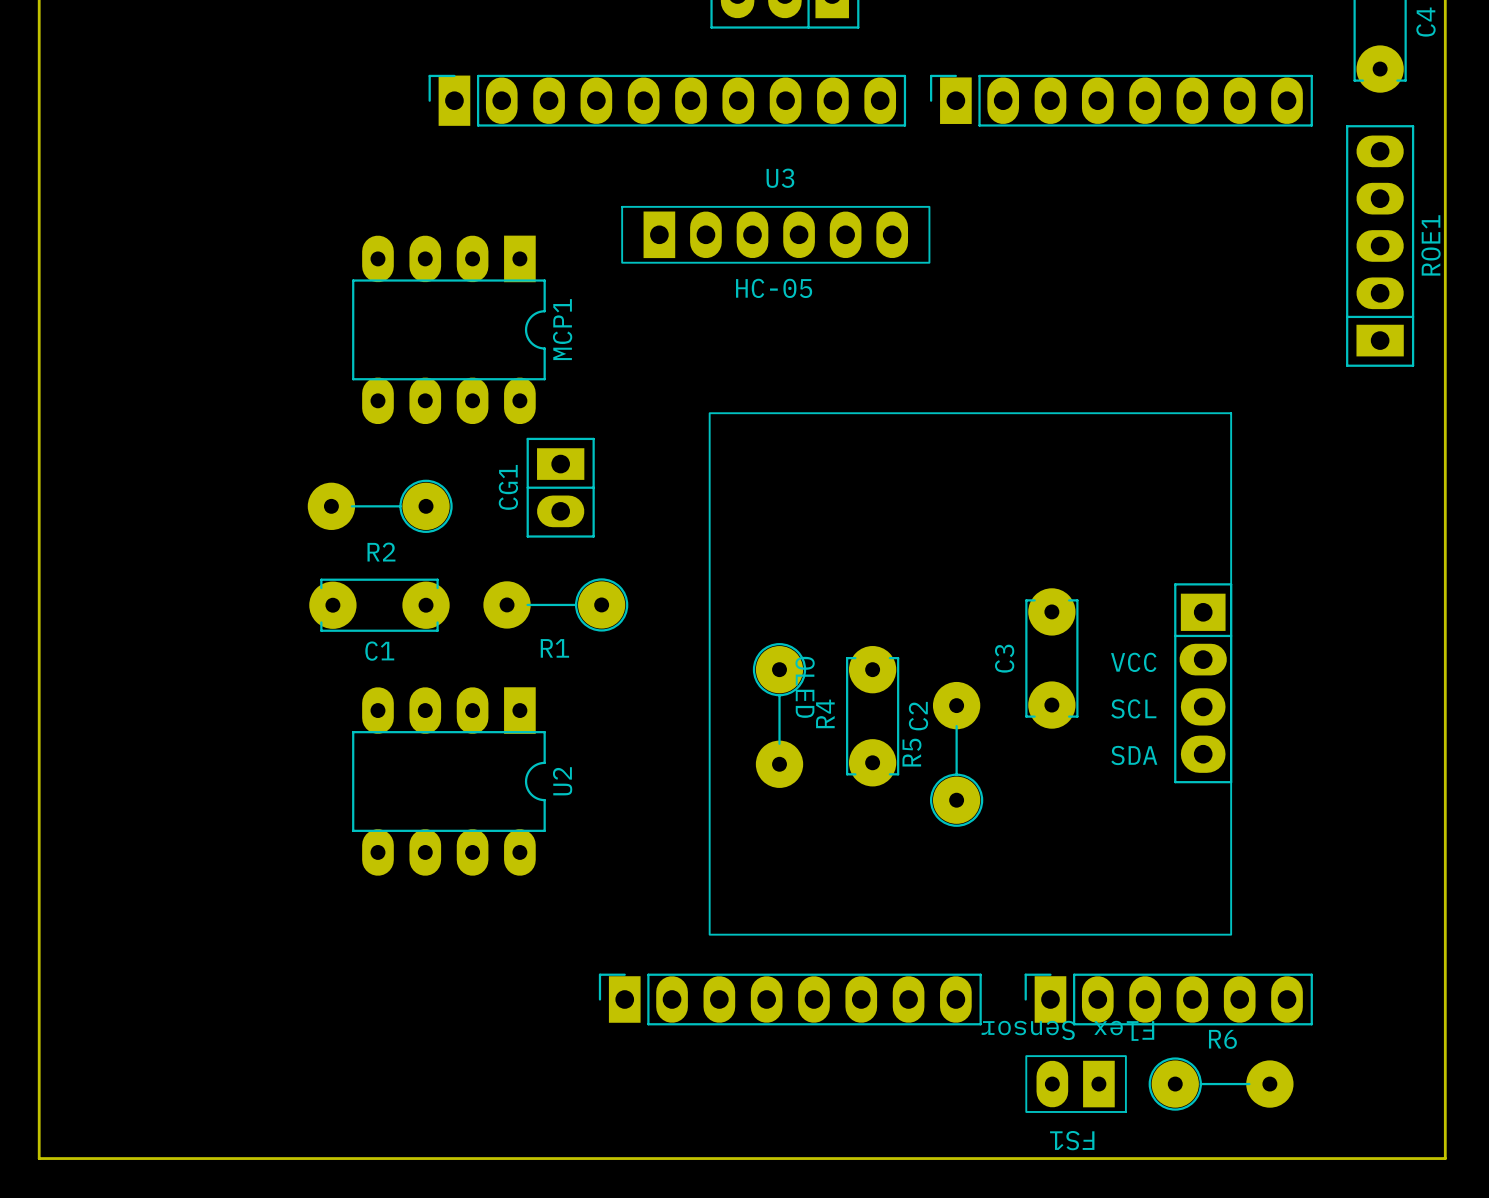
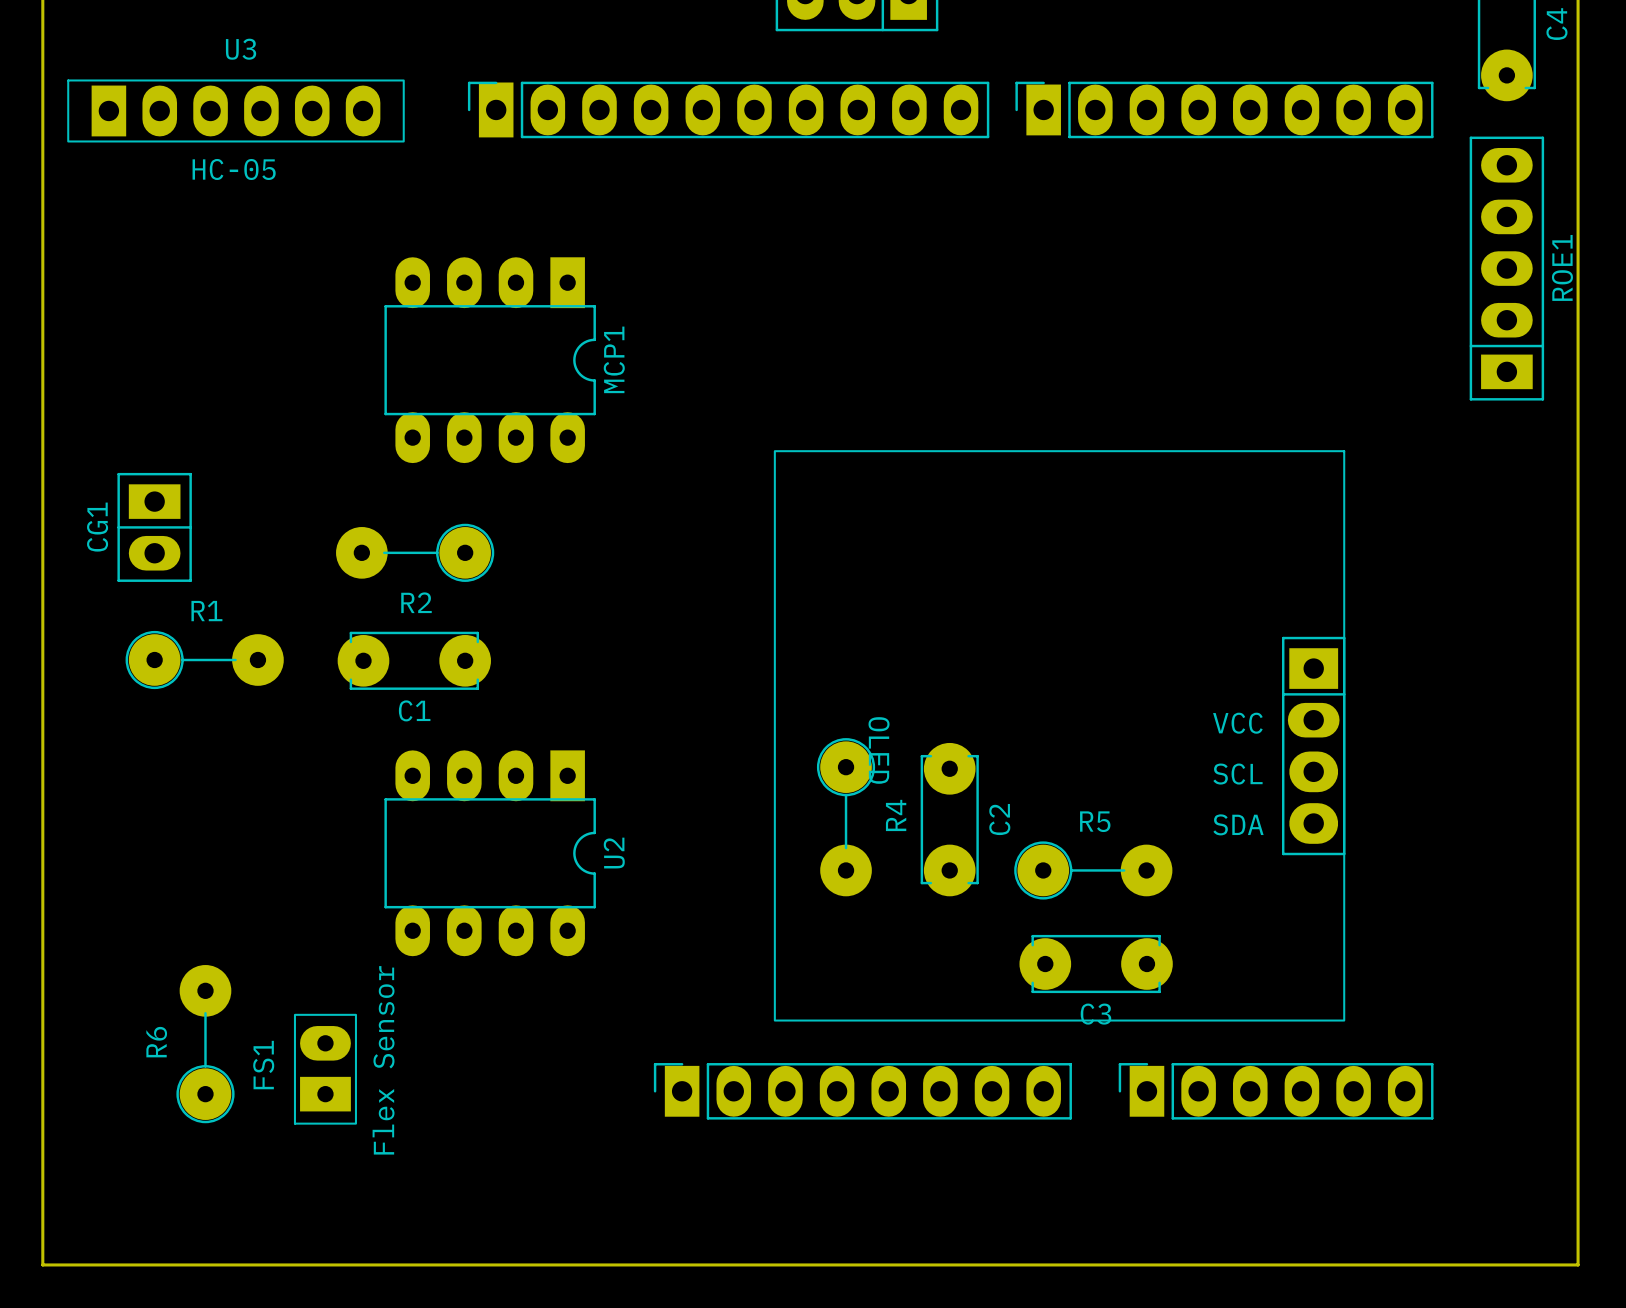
U3 position: (775, 234) -> (235, 110)
CG1 position: (560, 487) -> (154, 527)
R1 rotation: 0° (555, 604) -> 180° (204, 660)
R1 position: (555, 604) -> (204, 660)
C3 name position: C3 (1004, 658) -> C3 (1095, 1014)
C3 rotation: 0° (1051, 658) -> 90° clockwise (1096, 964)
C3 position: (1051, 658) -> (1096, 964)
R4 position: (779, 715) -> (846, 817)
C2 position: (872, 716) -> (949, 819)
R5 rotation: 0° (956, 754) -> 90° clockwise (1093, 870)
FS1 rotation: 0° (1076, 1084) -> 90° clockwise (325, 1069)
FS1 position: (1076, 1084) -> (325, 1069)
R6 rotation: 0° (1221, 1084) -> 90° counterclockwise (205, 1044)
R6 position: (1221, 1084) -> (205, 1044)

